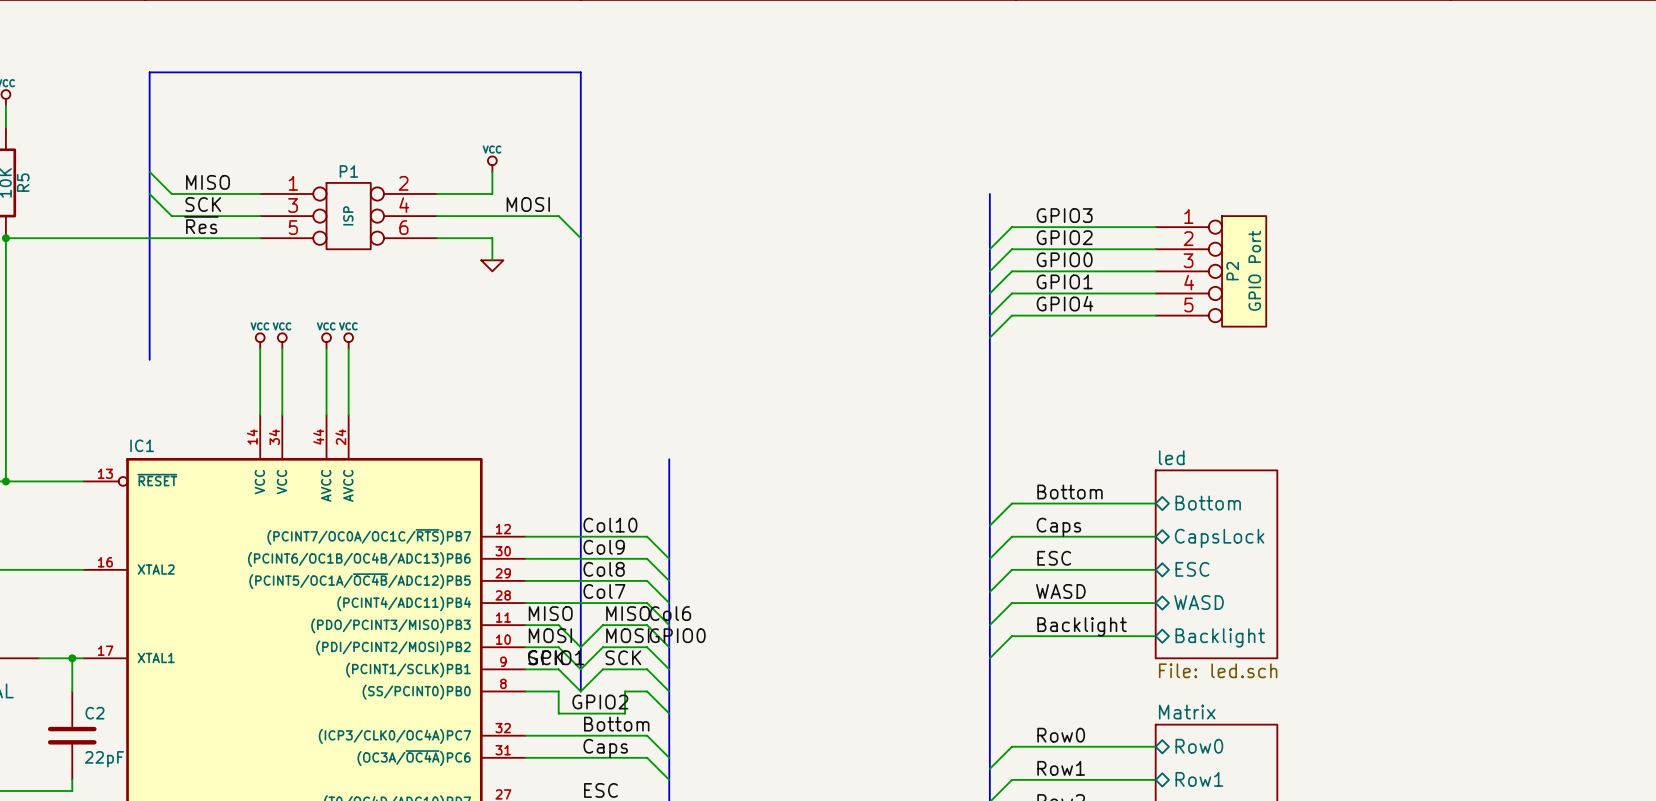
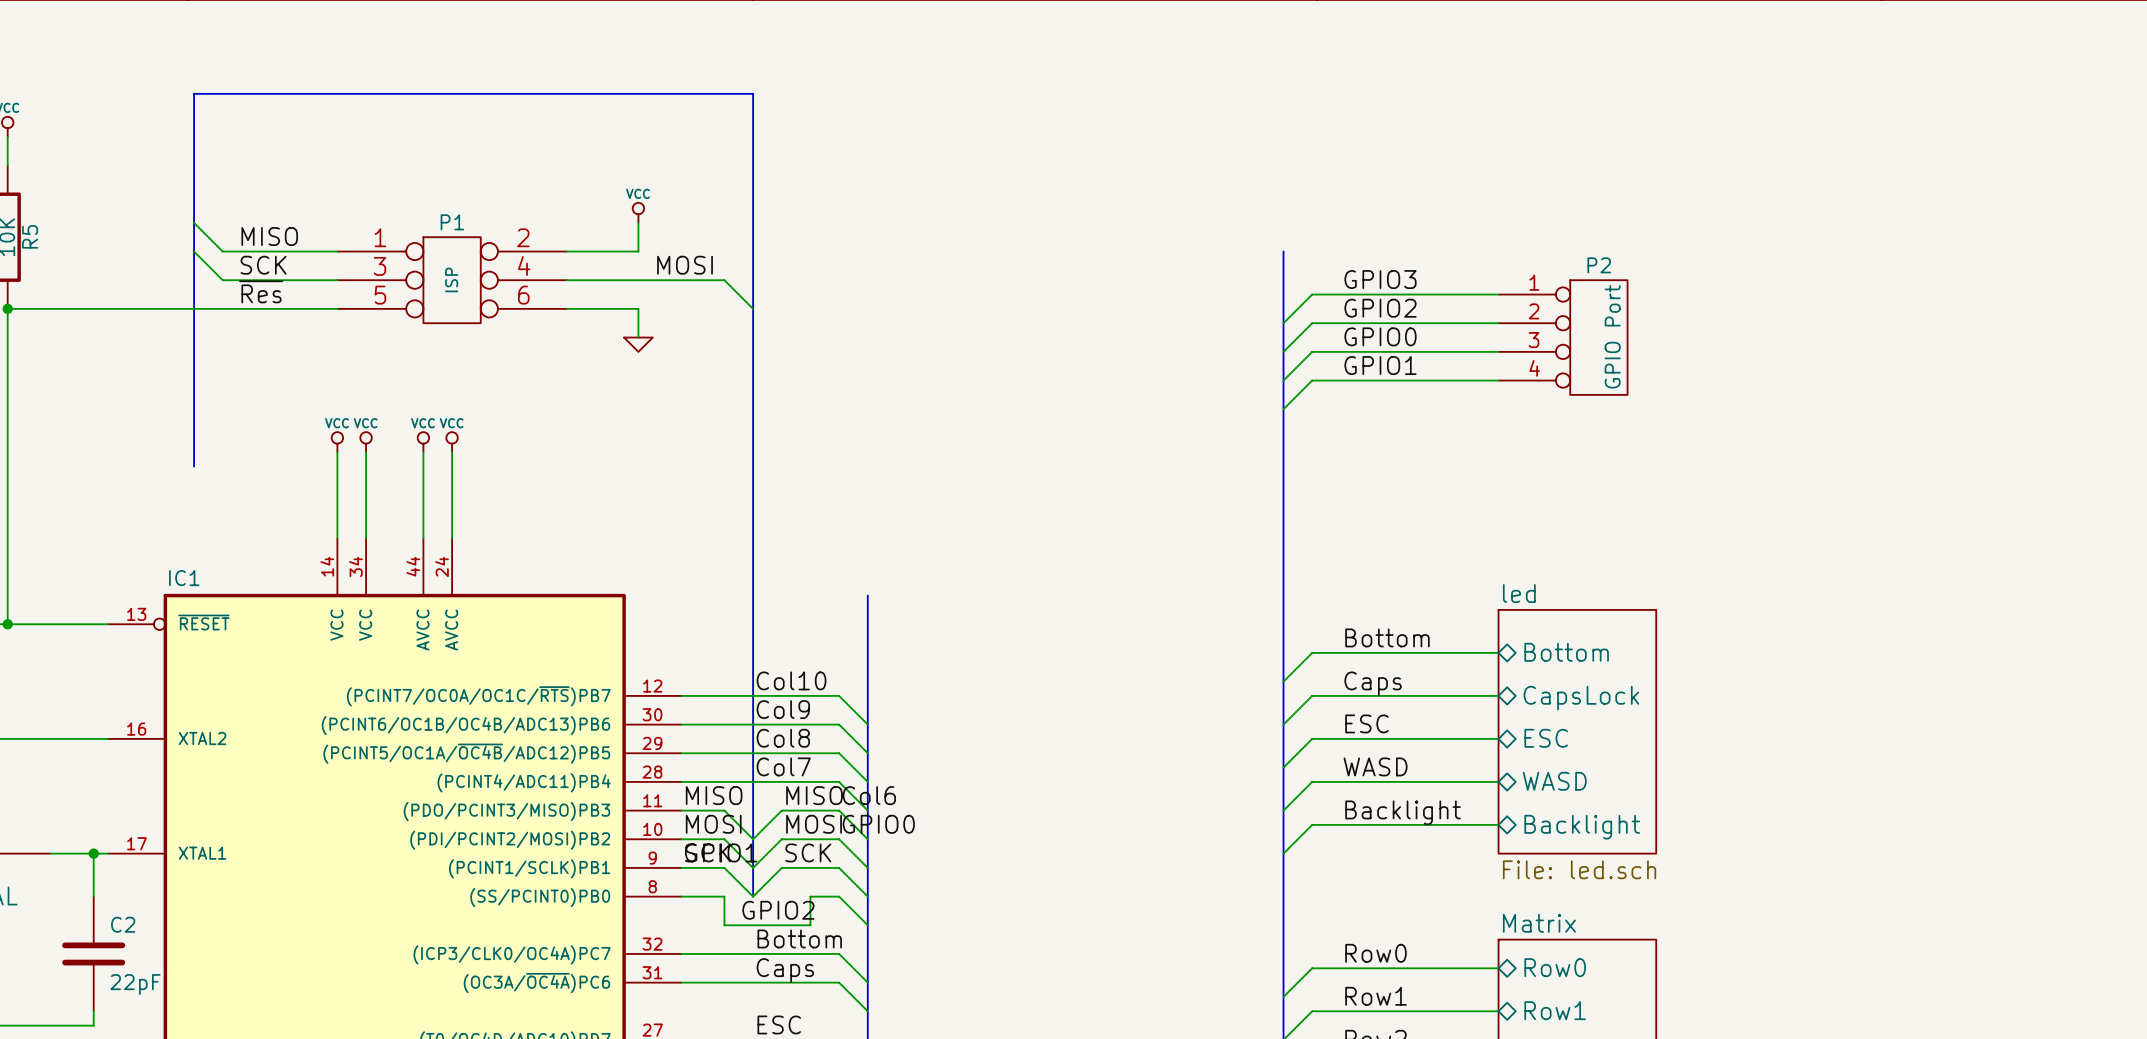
P2 symbol: [1155, 216, 1267, 327] -> [1498, 280, 1628, 395]
P2 name position: P2 (1232, 271) -> P2 (1599, 265)
label: GPIO4 (1064, 303) -> none
wire: (1155, 315) (1011, 315) (989, 337) -> none

